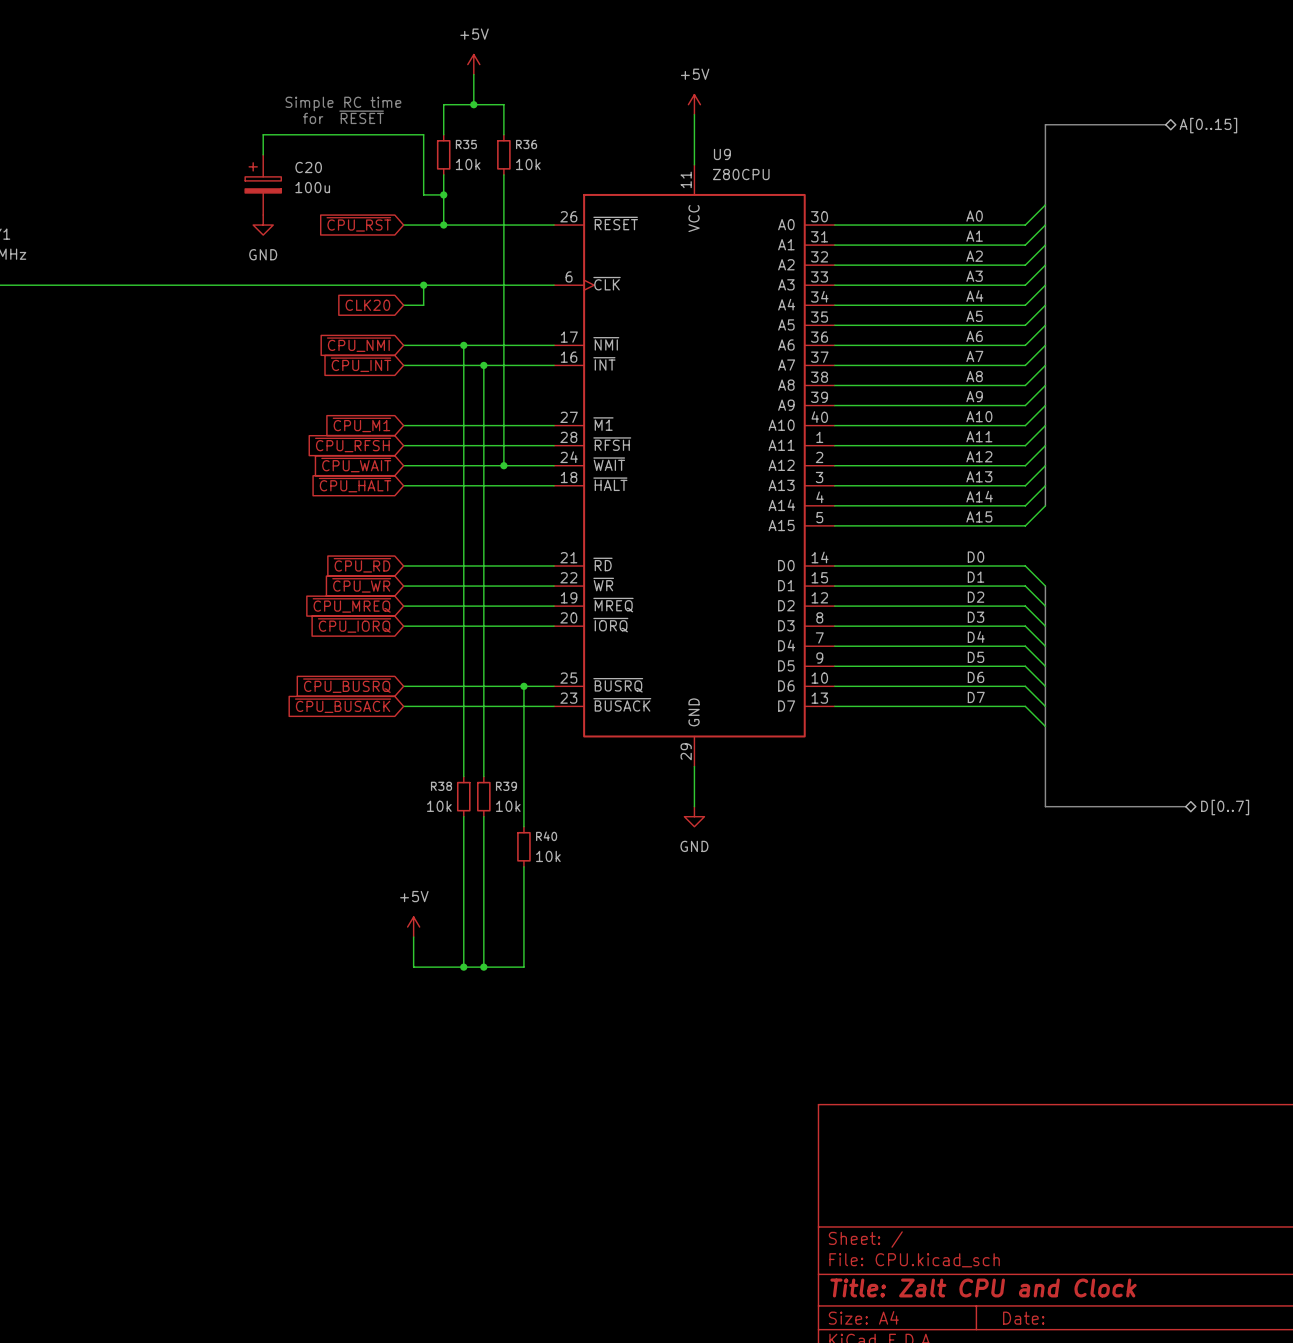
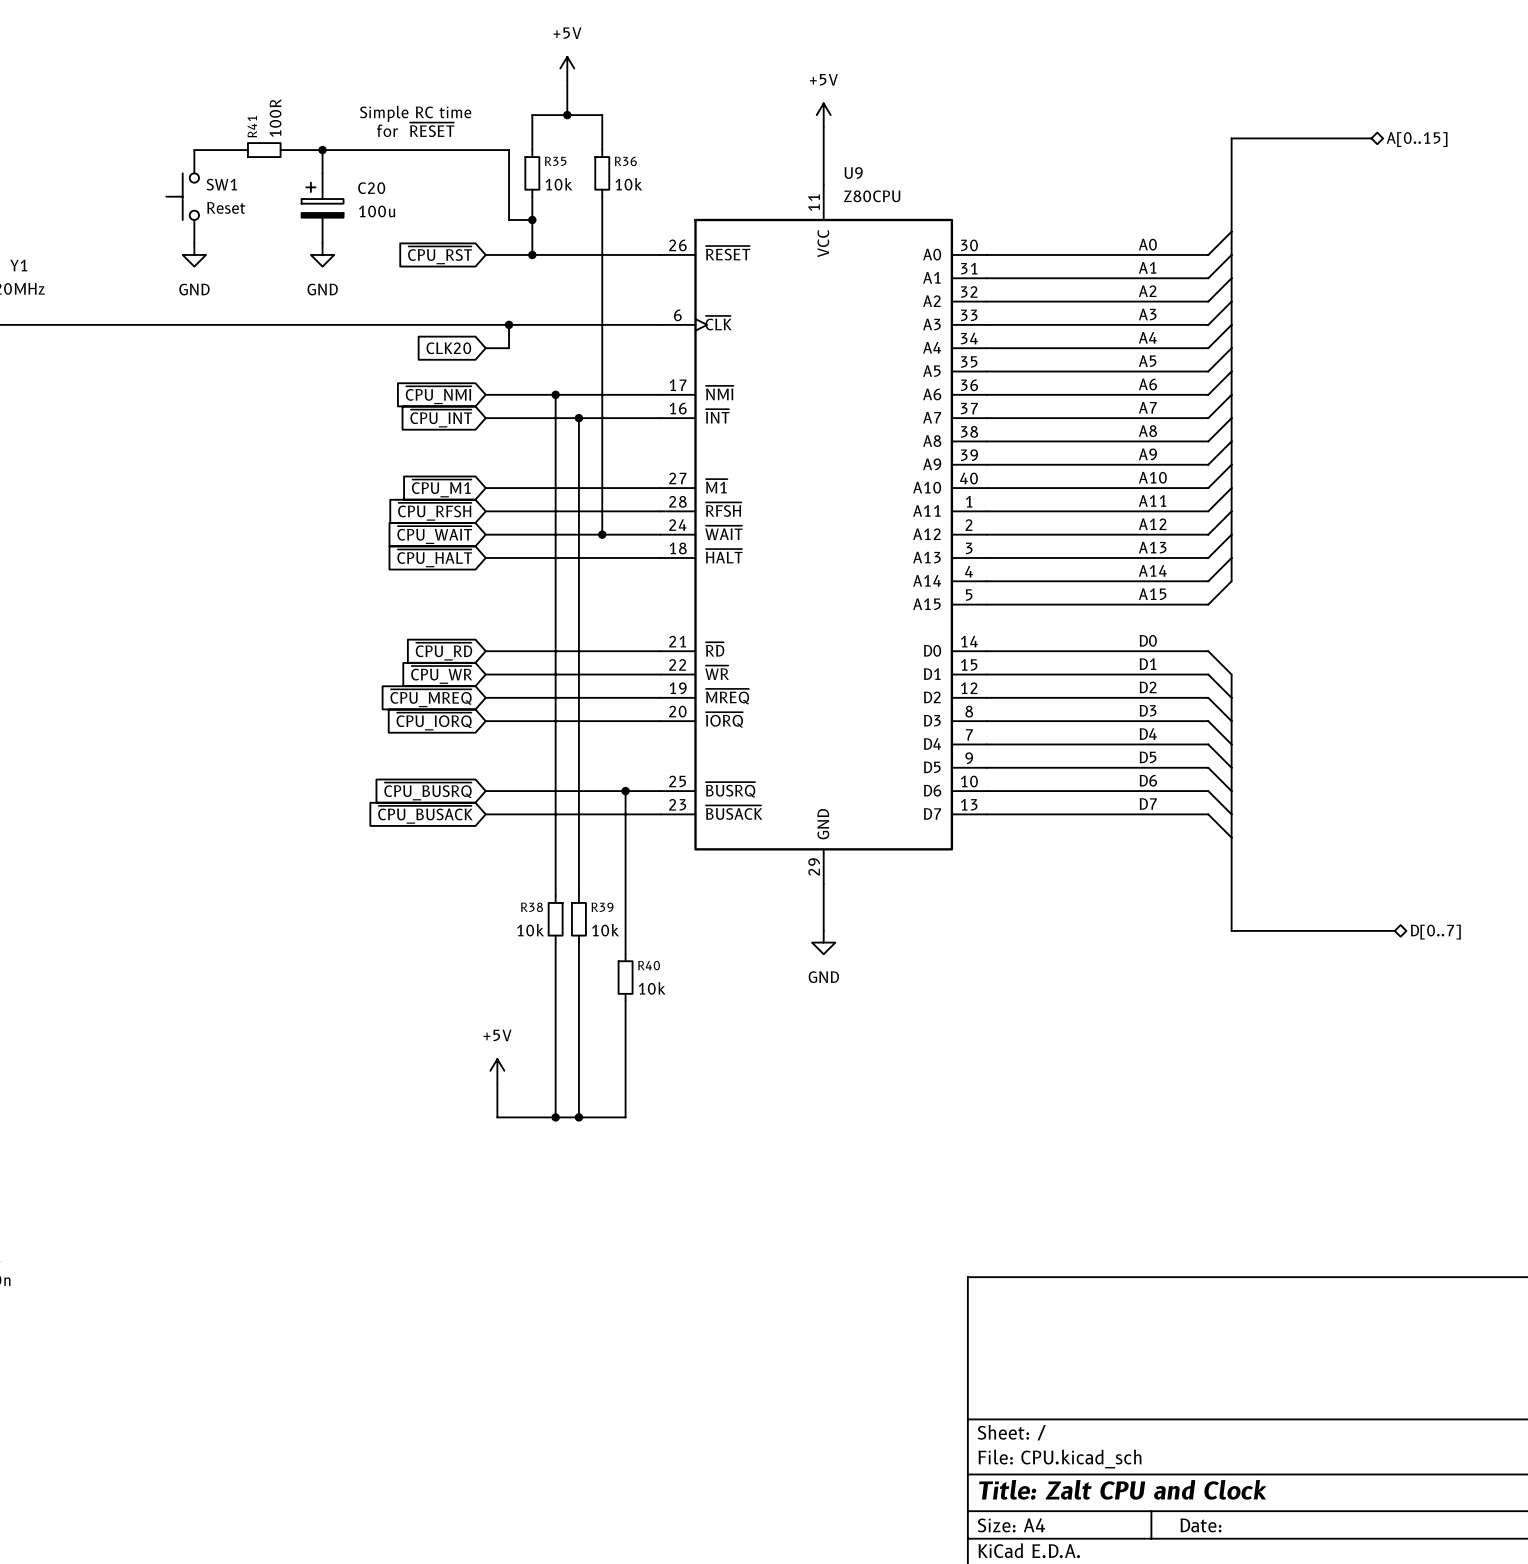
wire: none -> (194, 150) (240, 150)
R41: none -> 100R (264, 150)
wire: none -> (287, 150) (322, 150)
junction: none -> (322, 150)
SW1: none -> Reset (182, 196)
power symbol: none -> GND (194, 254)

